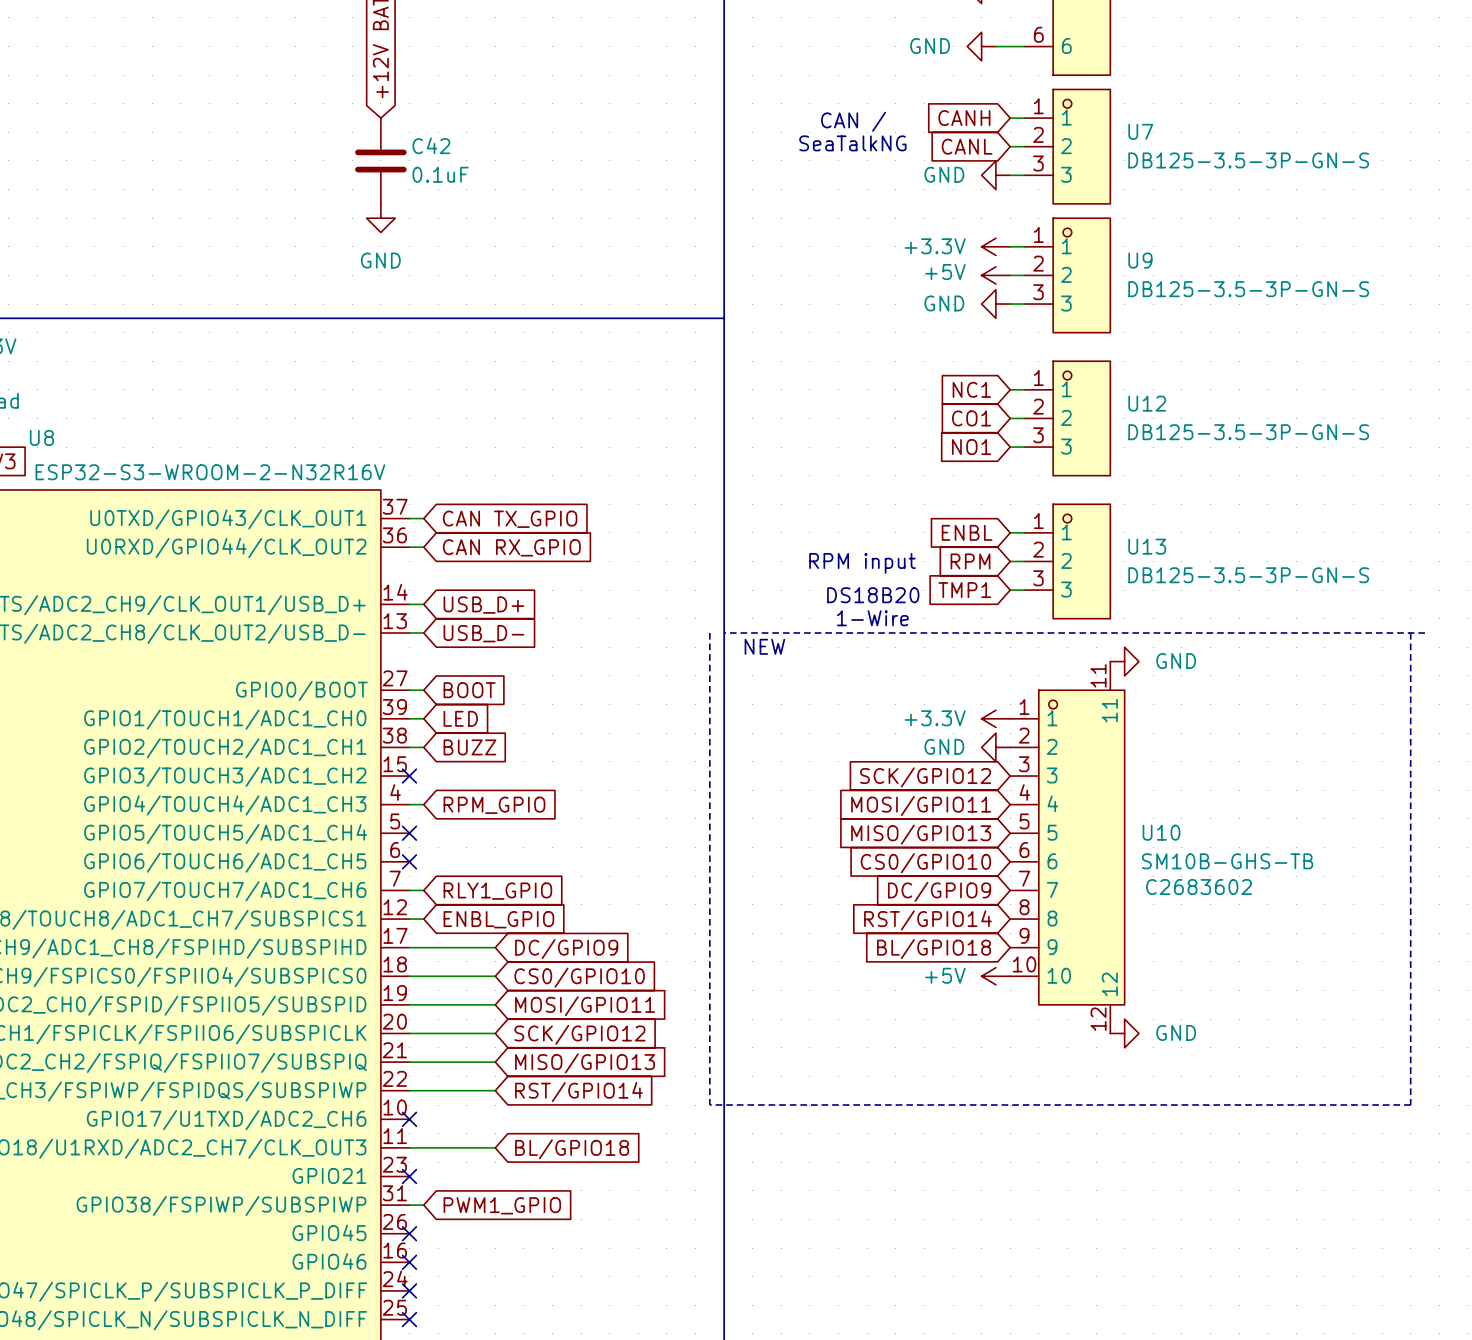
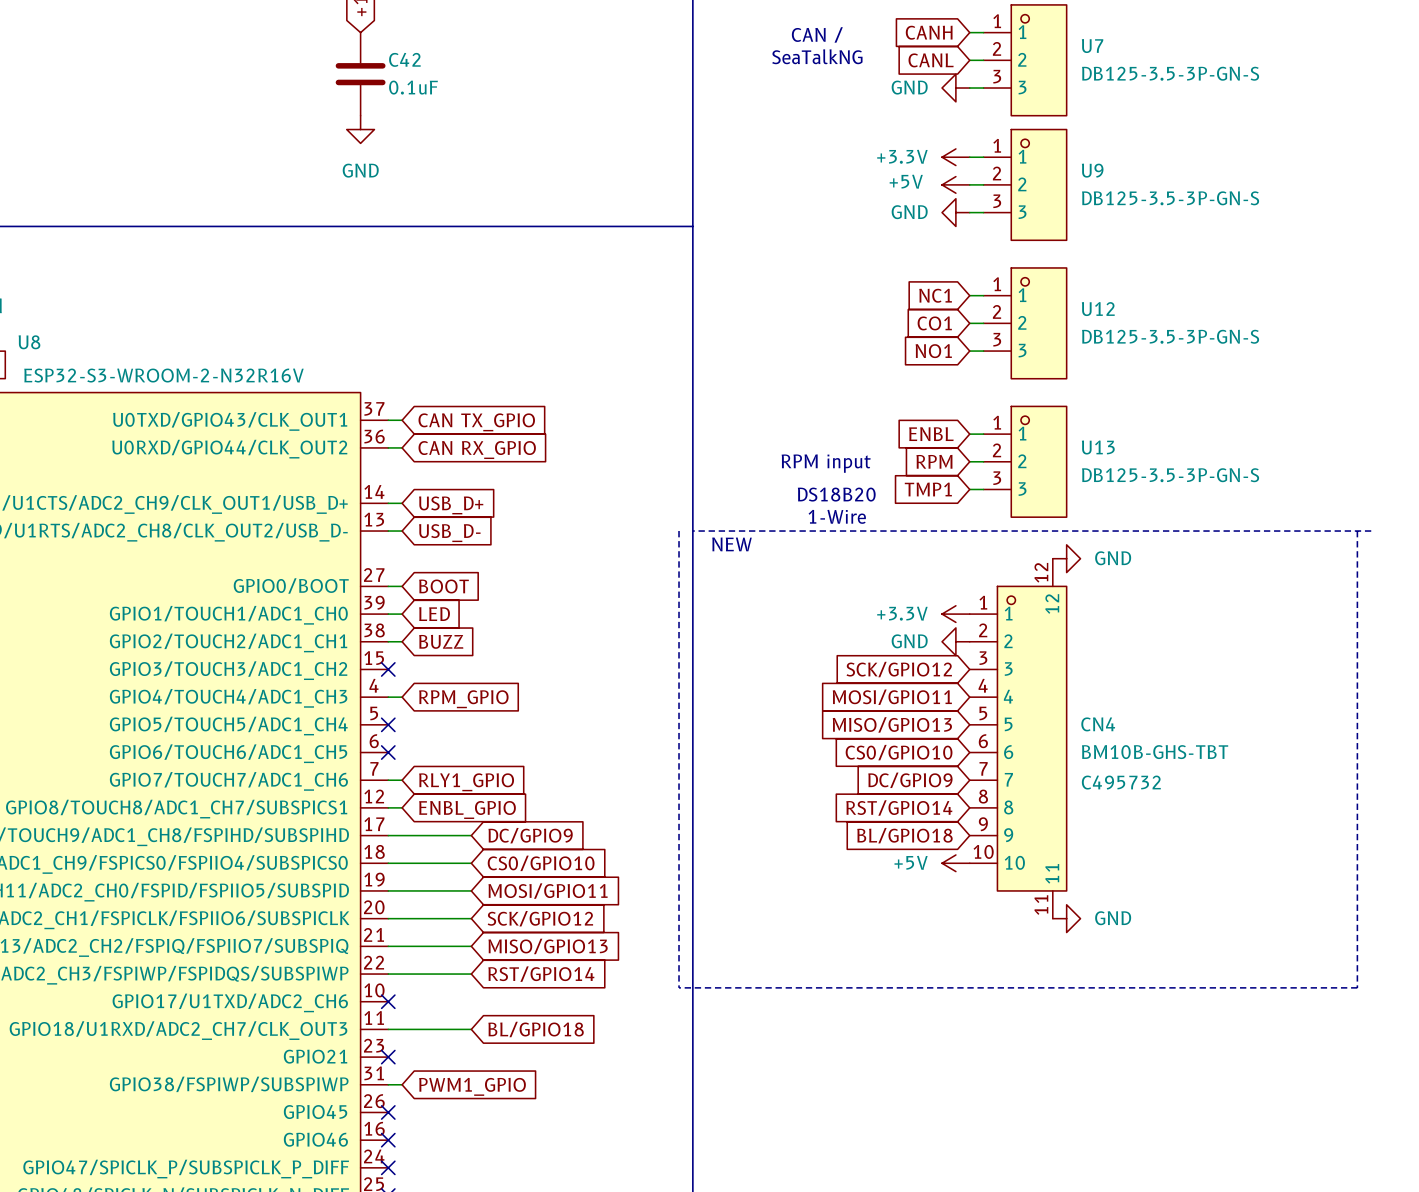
power symbol position: GND (1124, 661) -> GND (1066, 558)
CN4: none -> BM10B-GHS-TBT (1018, 738)
U10: SM10B-GHS-TB (1067, 847) -> none
power symbol position: GND (1124, 1033) -> GND (1066, 918)

